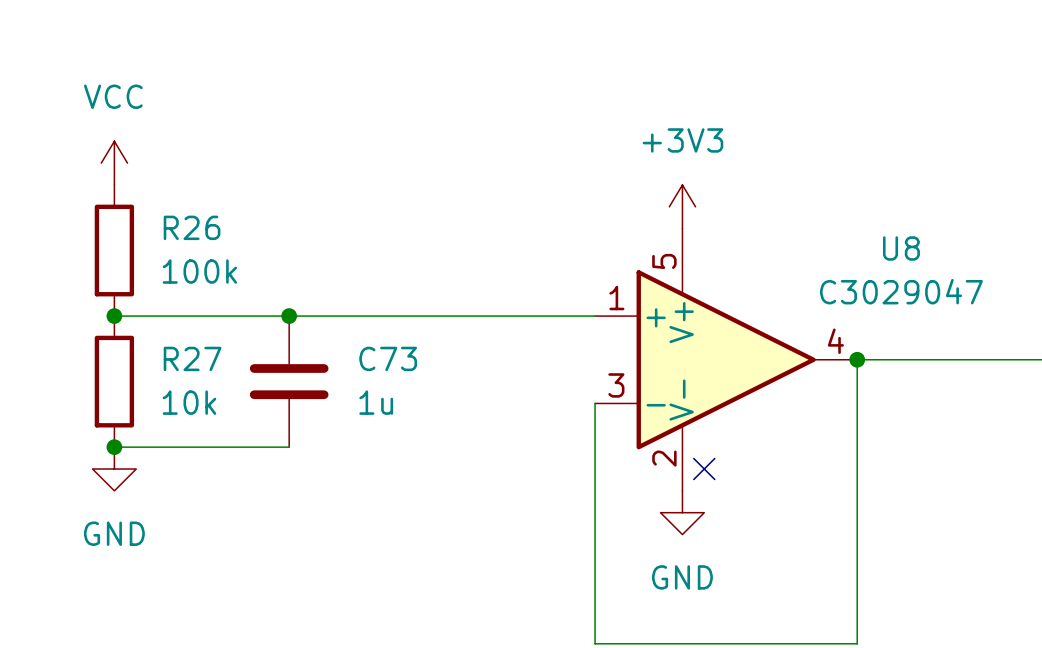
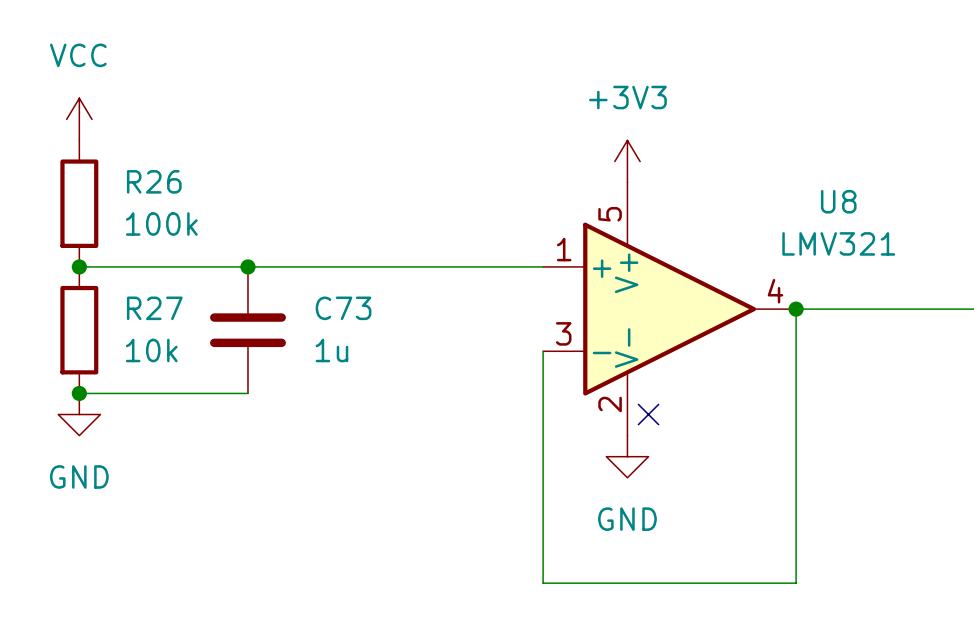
U8 value: C3029047 (901, 291) -> LMV321 (838, 243)

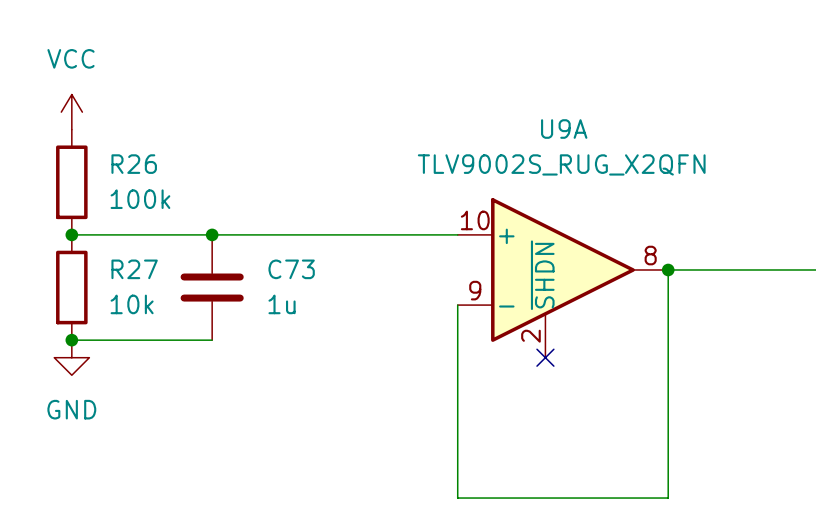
power symbol: +3V3 (627, 161) -> none
U8: LMV321 (669, 309) -> none
U9A: none -> TLV9002S_RUG_X2QFN (562, 277)
power symbol: GND (627, 456) -> none

